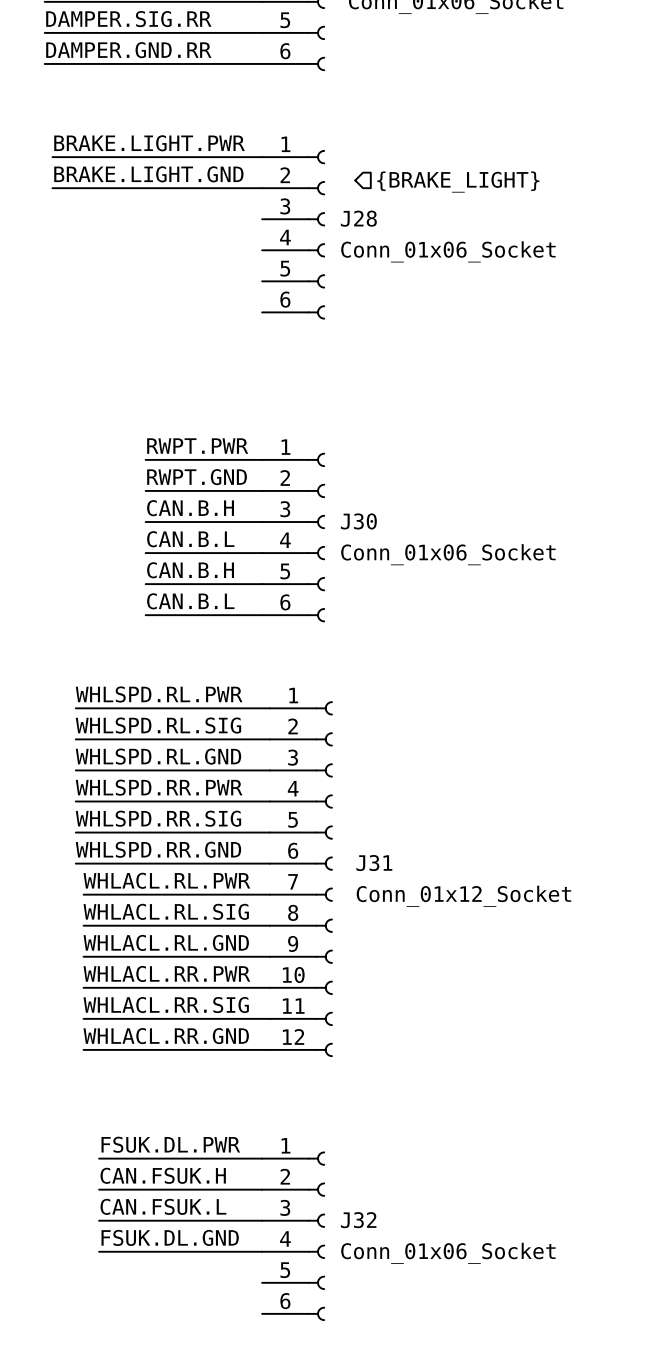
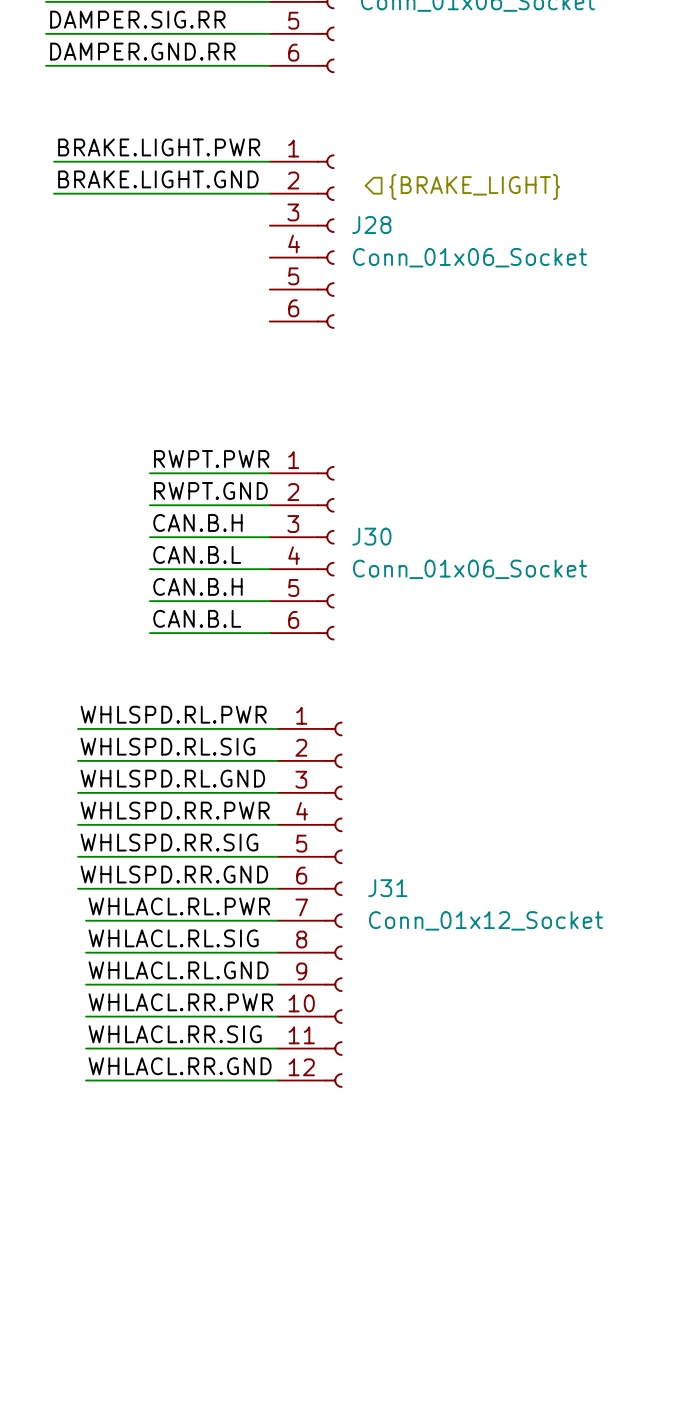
label: FSUK.DL.PWR (170, 1144) -> none
wire: (99, 1158) (262, 1158) -> none
label: CAN.FSUK.H (163, 1175) -> none
wire: (99, 1189) (262, 1189) -> none
label: CAN.FSUK.L (163, 1206) -> none
wire: (99, 1220) (262, 1220) -> none
J32: Conn_01x06_Socket (293, 1236) -> none
label: FSUK.DL.GND (170, 1237) -> none
wire: (99, 1251) (262, 1251) -> none

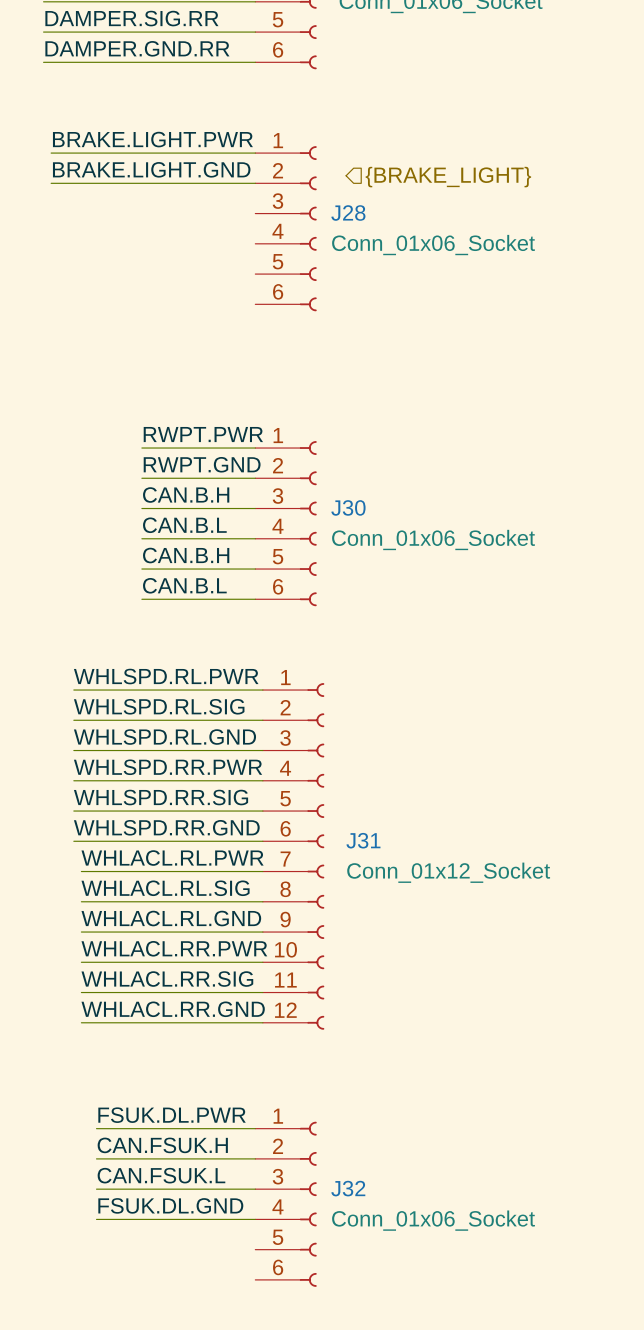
label: none -> FSUK.DL.PWR (172, 1115)
wire: none -> (96, 1128) (255, 1128)
label: none -> CAN.FSUK.H (162, 1145)
wire: none -> (96, 1158) (255, 1158)
label: none -> CAN.FSUK.L (161, 1175)
wire: none -> (96, 1189) (255, 1189)
J32: none -> Conn_01x06_Socket (286, 1204)
label: none -> FSUK.DL.GND (170, 1205)
wire: none -> (96, 1219) (255, 1219)

